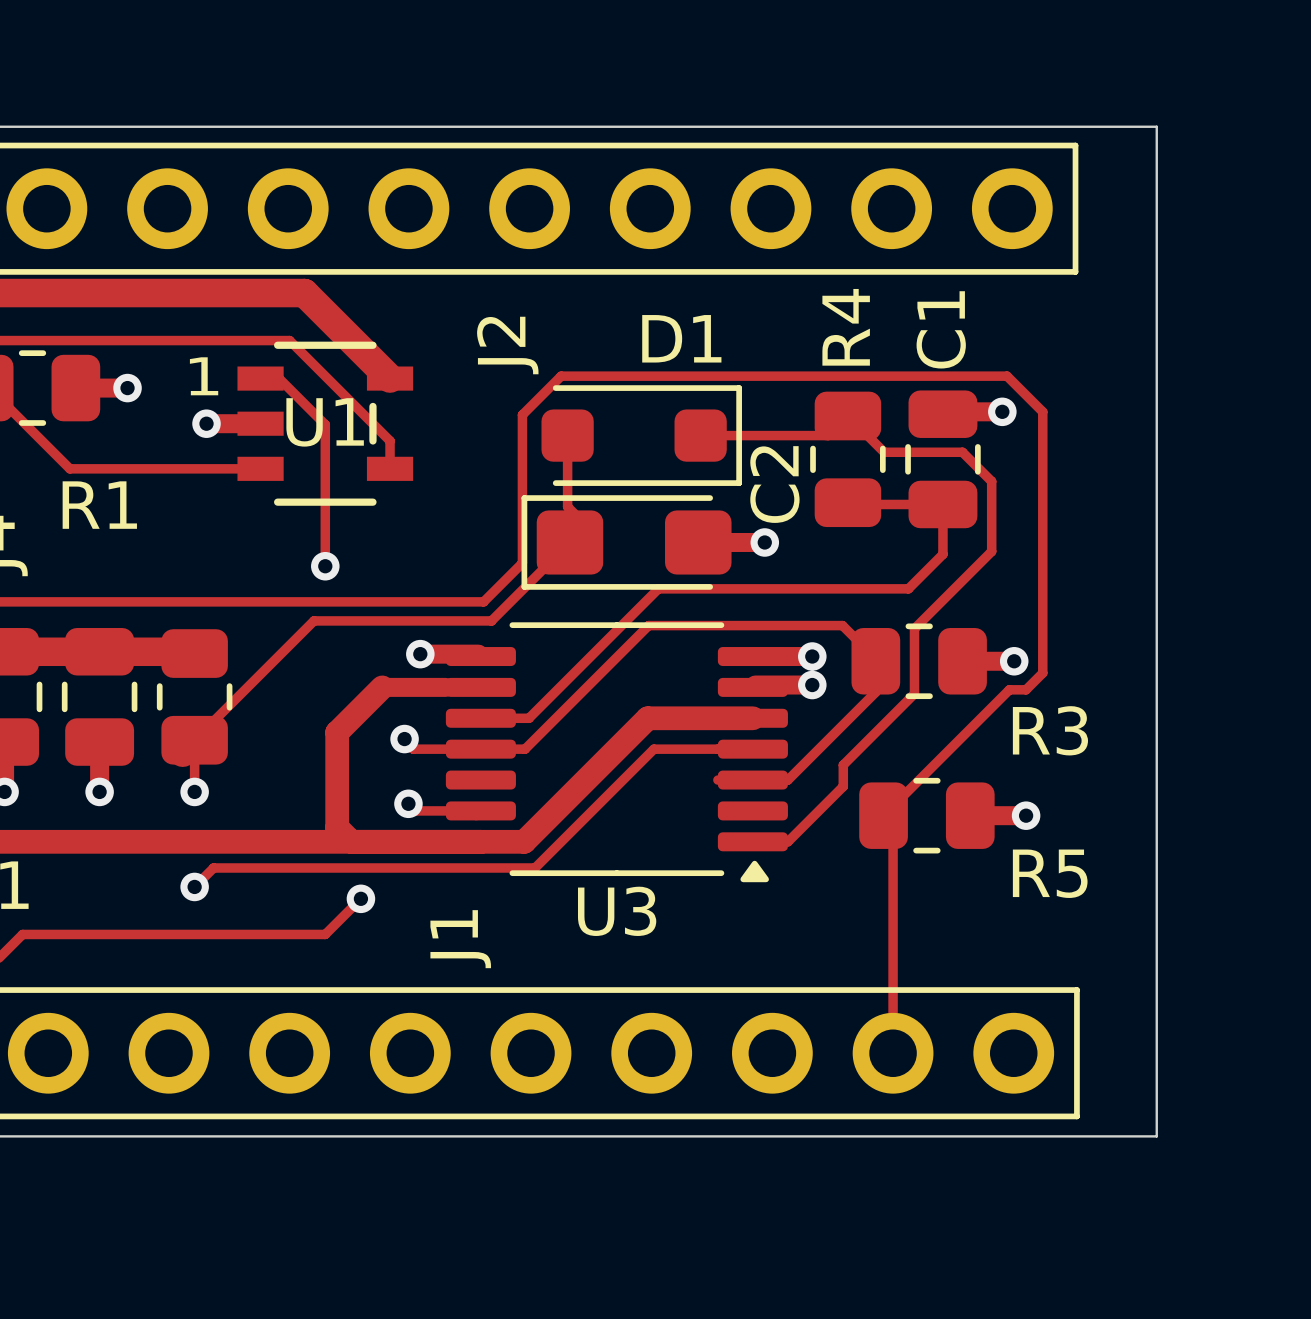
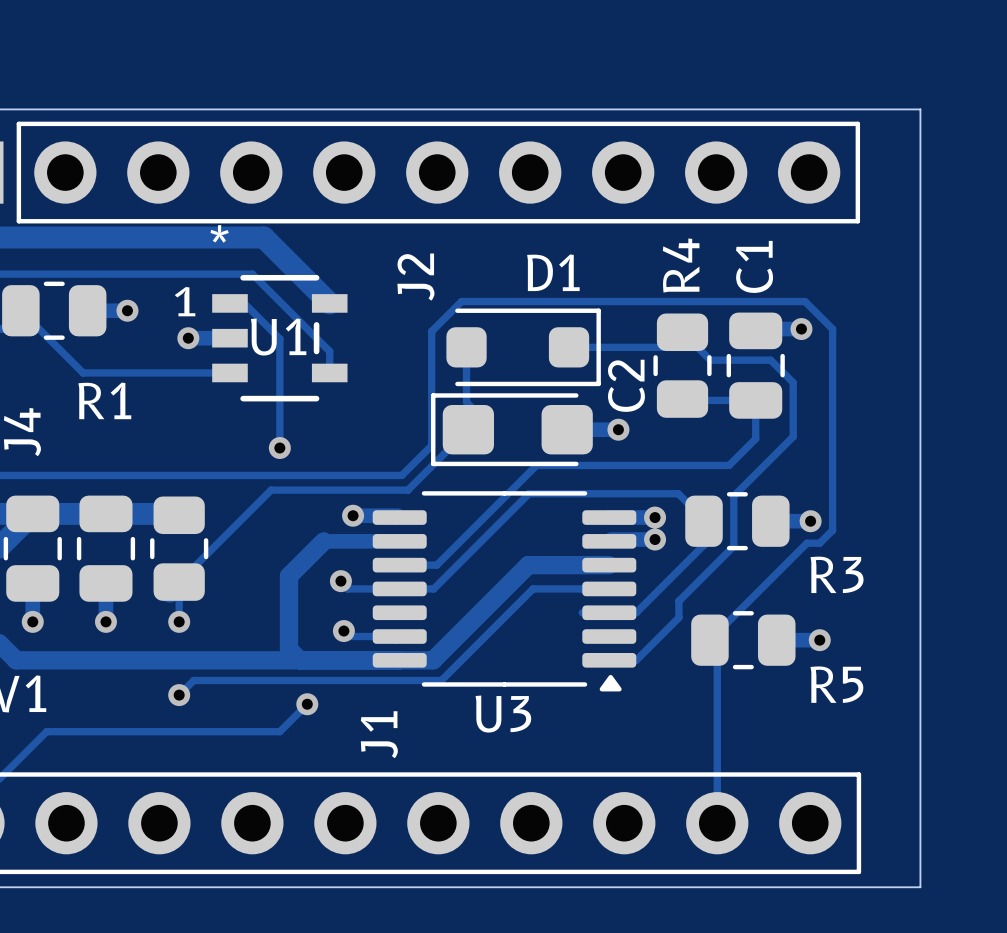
U1 text: none -> * (219, 233)

